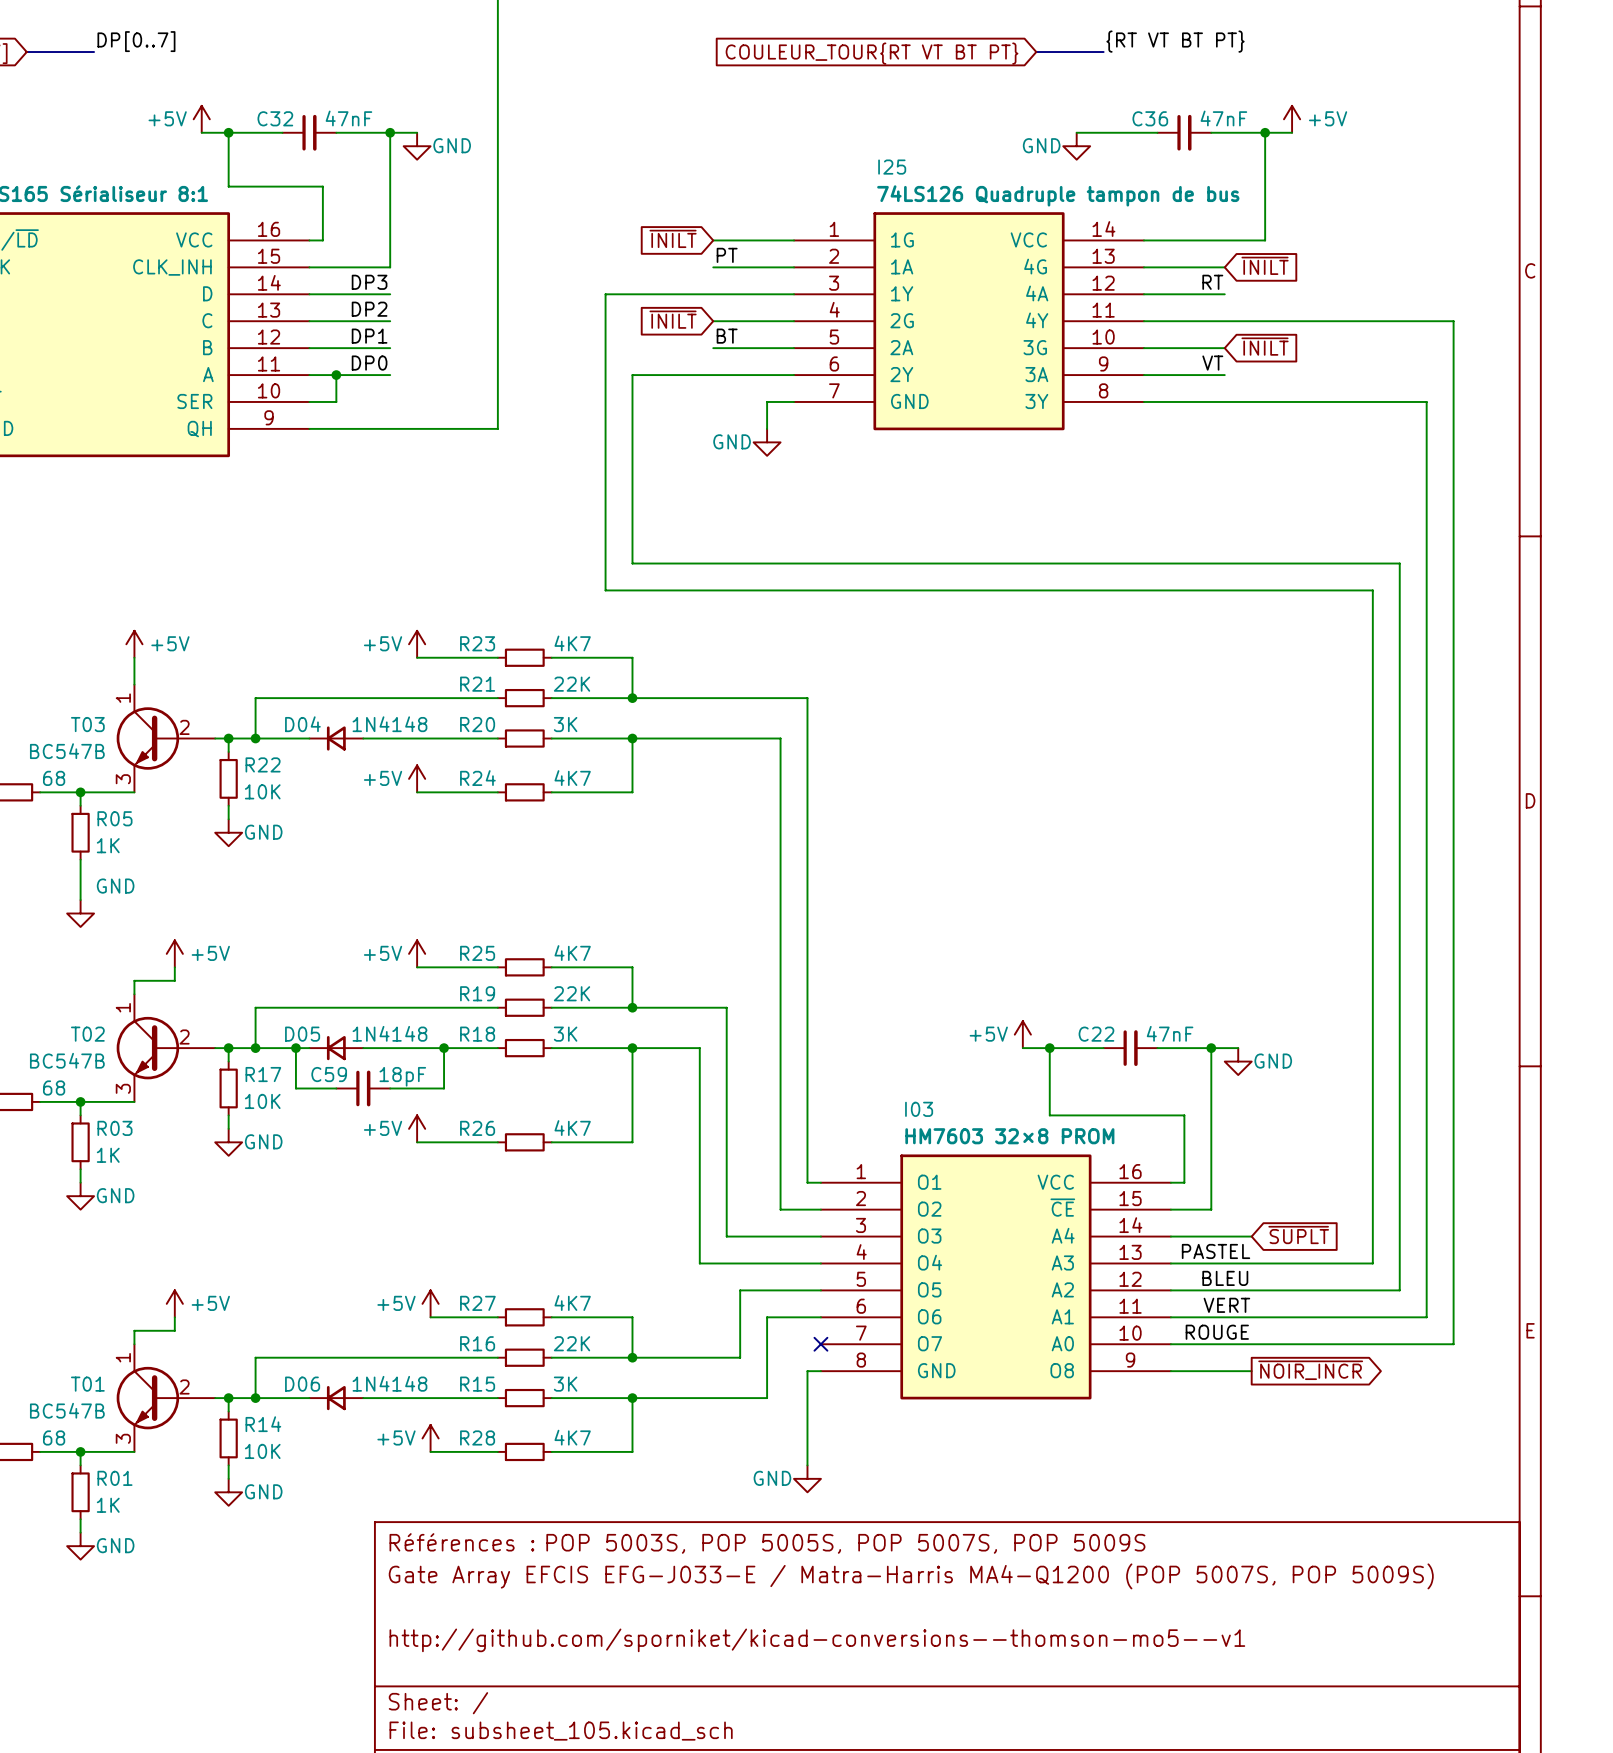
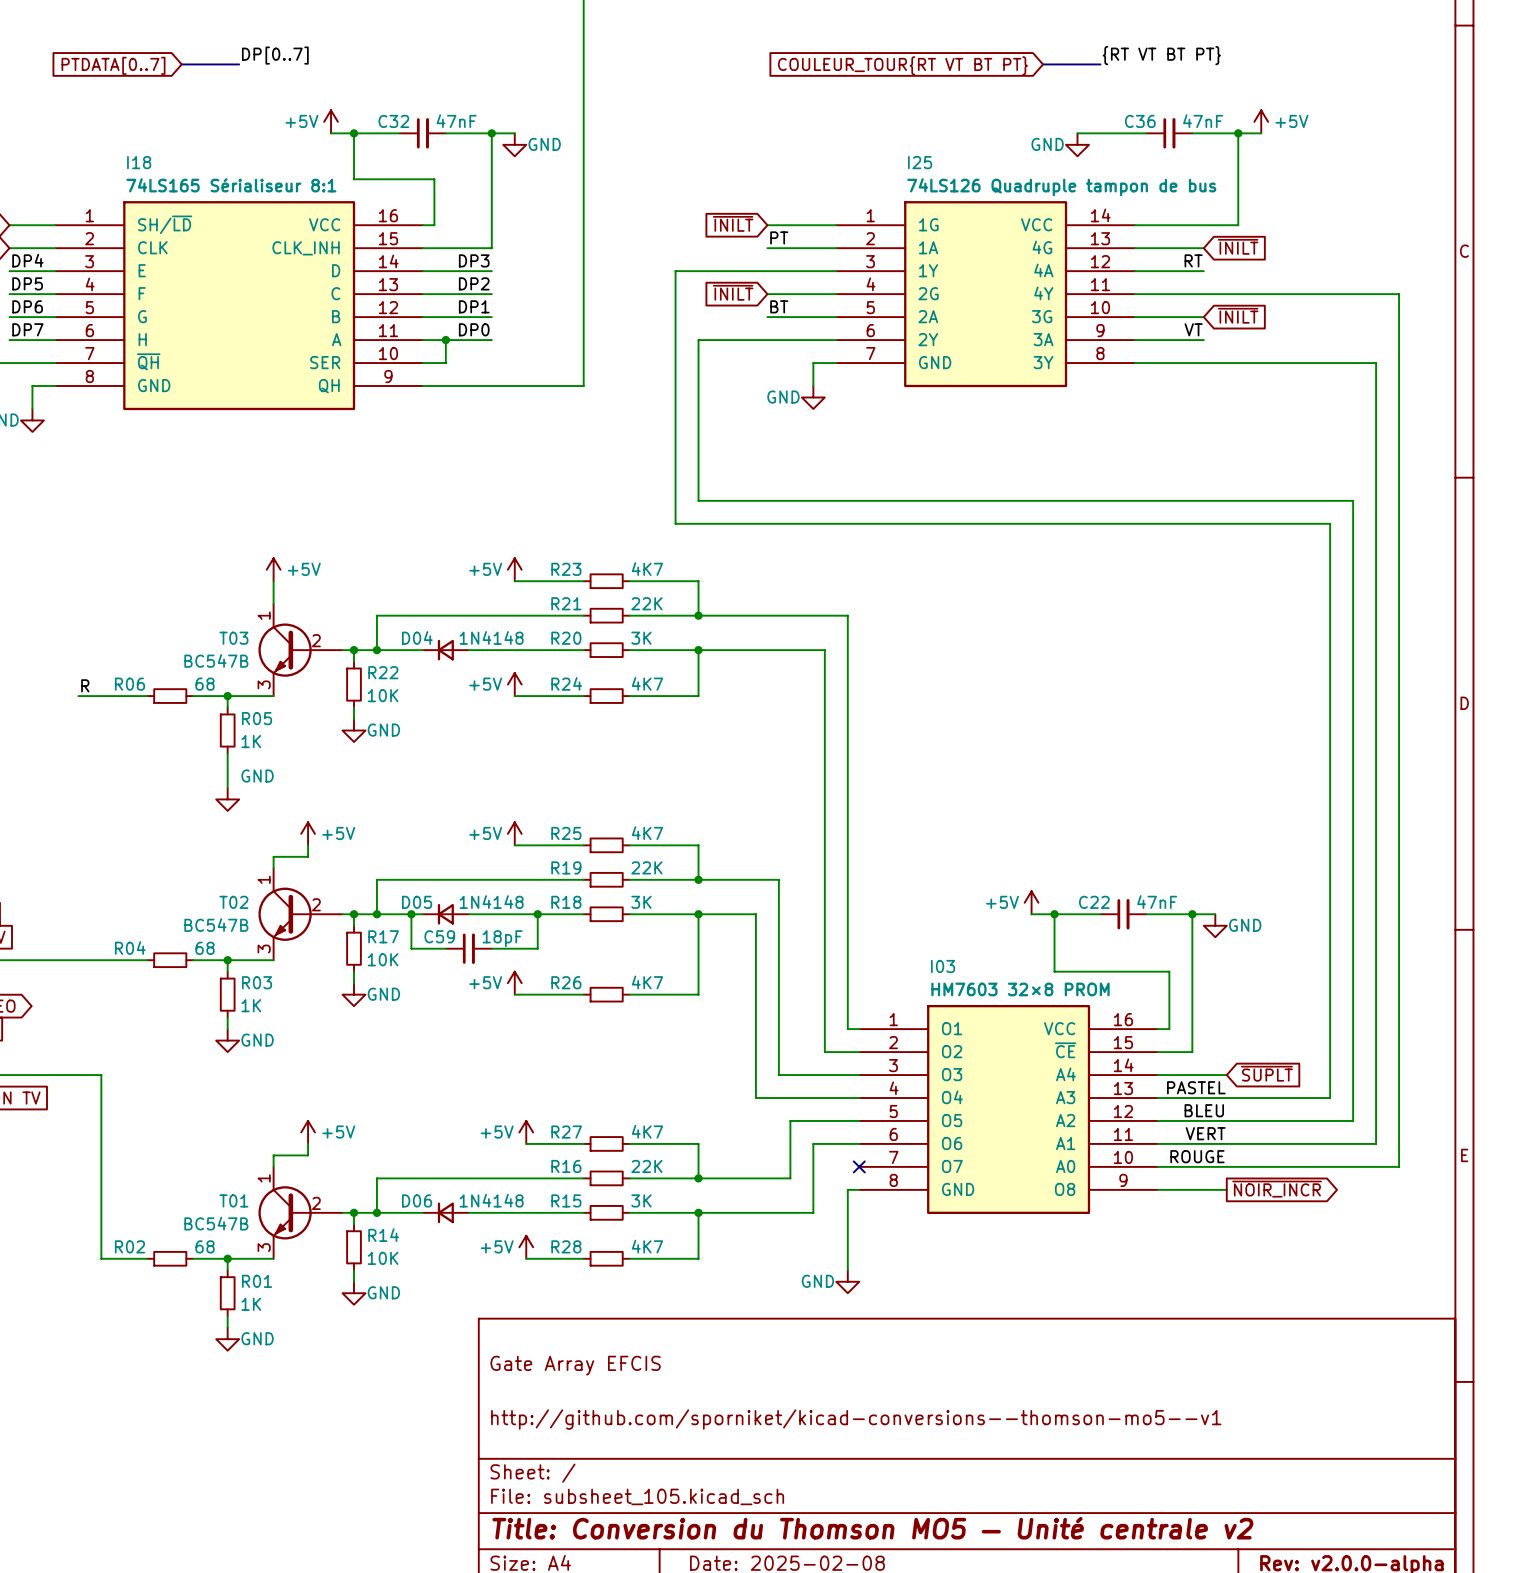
title block: Références : POP 5003S, POP 5005S, POP 5007S, POP 5009S (767, 1543) -> none
title block: Gate Array EFCIS EFG-J033-E / Matra-Harris MA4-Q1200 (POP 5007S, POP 5009S) (911, 1576) -> Gate Array EFCIS (575, 1365)

